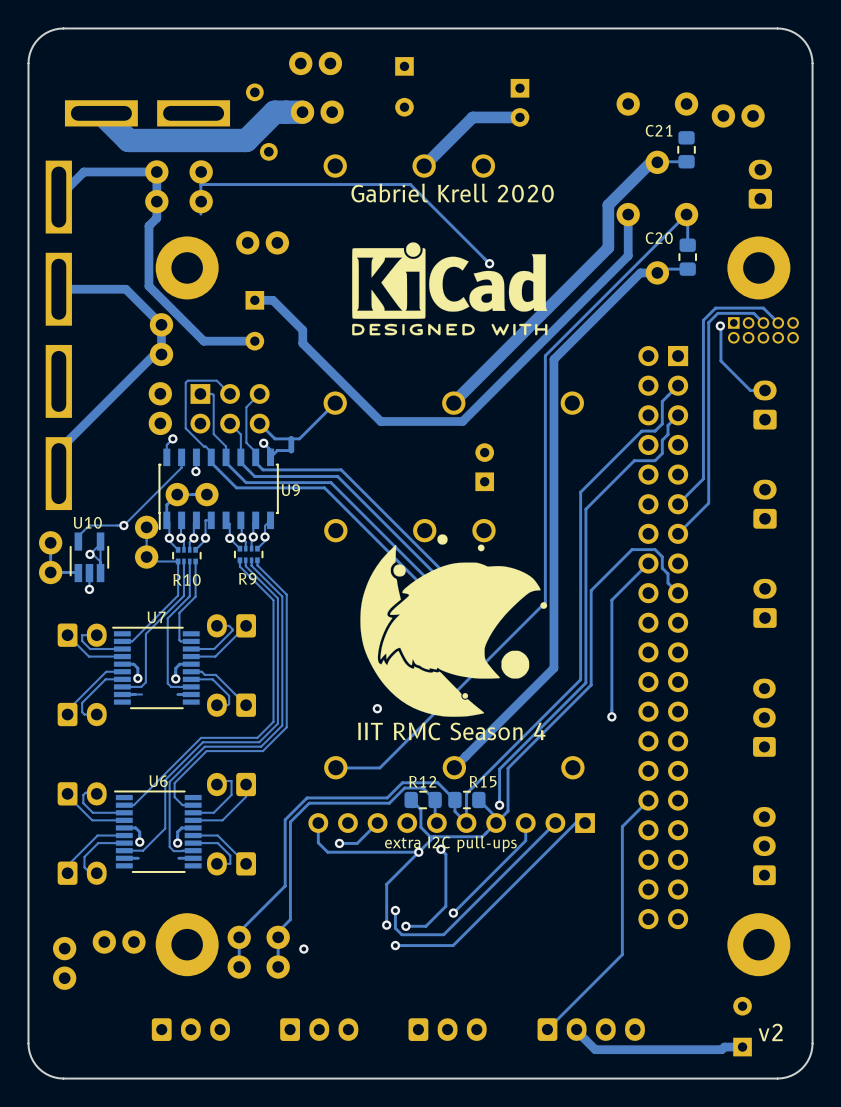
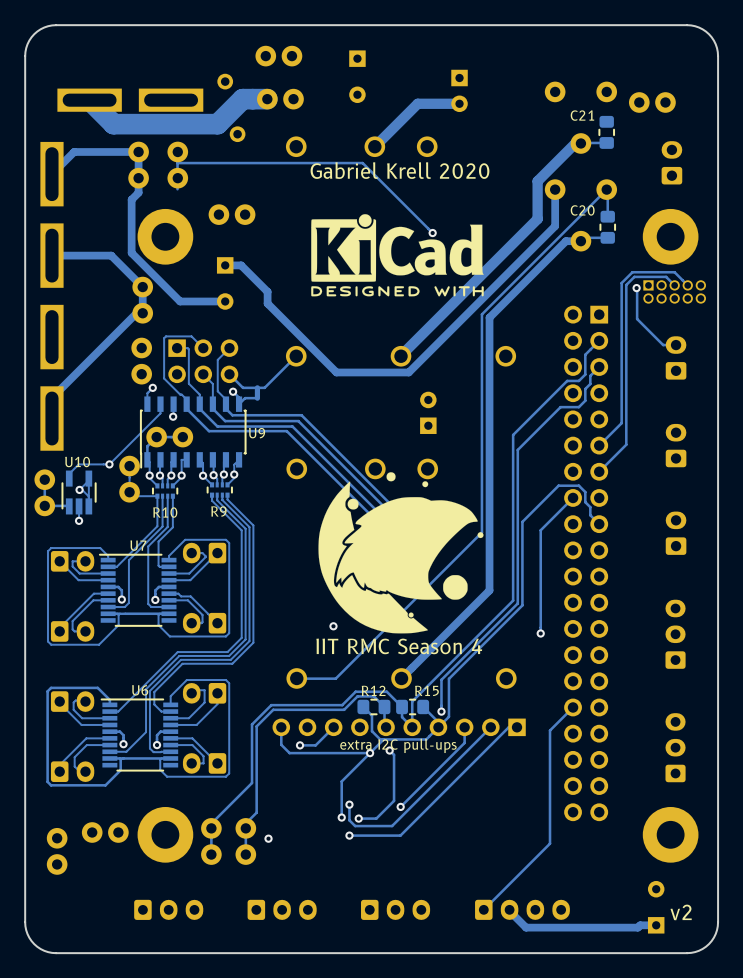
track: none -> (108, 560) (108, 555) (100, 548) (51, 548) (47, 551) (47, 641) (51, 644) (99, 644) (118, 625) (118, 614) (108, 613)
track: none -> (169, 560) (169, 555) (185, 539) (225, 539) (229, 543) (229, 633) (225, 636) (169, 636) (158, 625) (158, 614) (169, 613)
track: none -> (157, 613) (120, 613)
track: none -> (109, 704) (109, 699) (97, 687) (51, 687) (47, 691) (47, 781) (51, 785) (105, 785) (120, 770) (119, 758)
track: none -> (170, 704) (170, 696) (186, 680) (225, 680) (229, 683) (229, 773) (225, 776) (167, 776) (160, 769) (160, 759) (170, 758)
track: none -> (123, 758) (158, 758)

